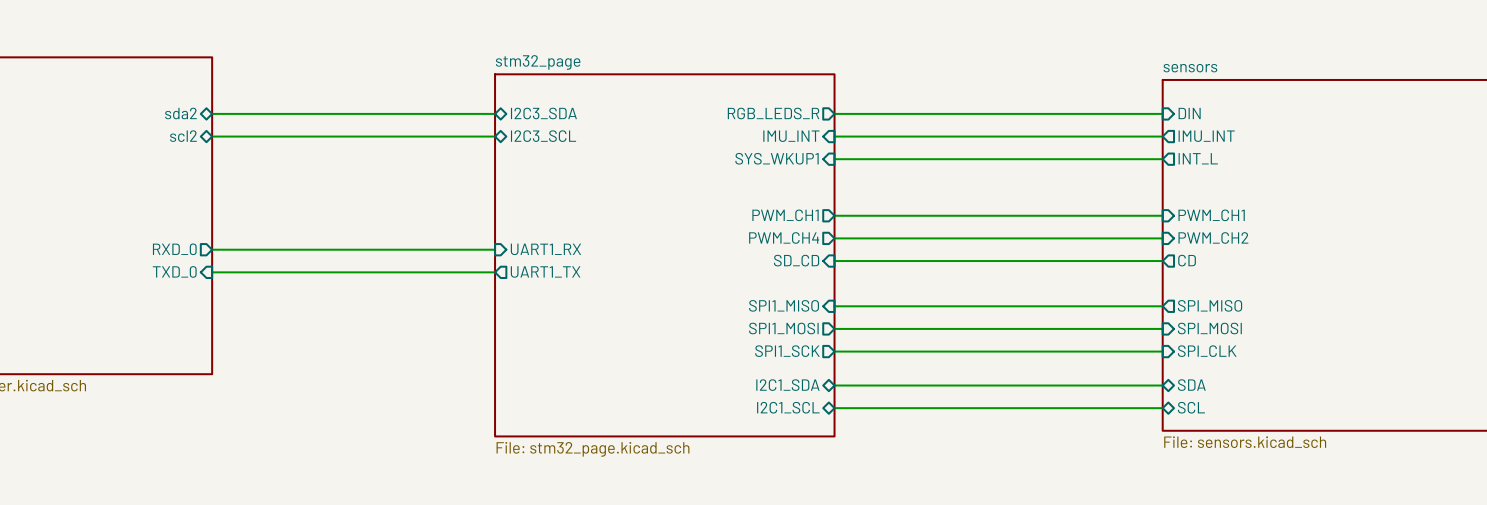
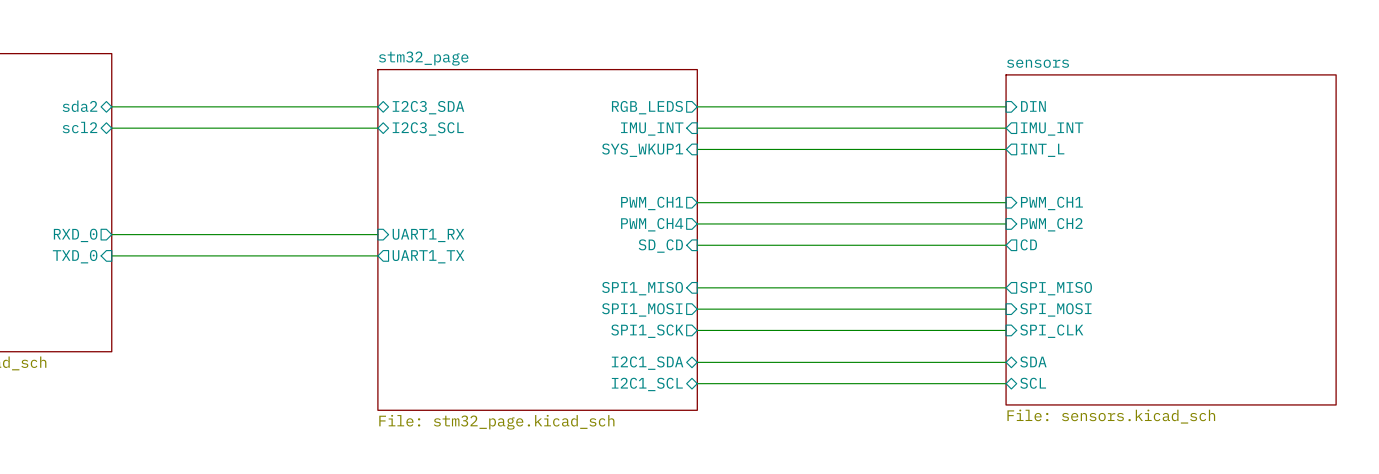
sheet pin: RGB_LEDS_R (773, 113) -> RGB_LEDS (647, 107)

